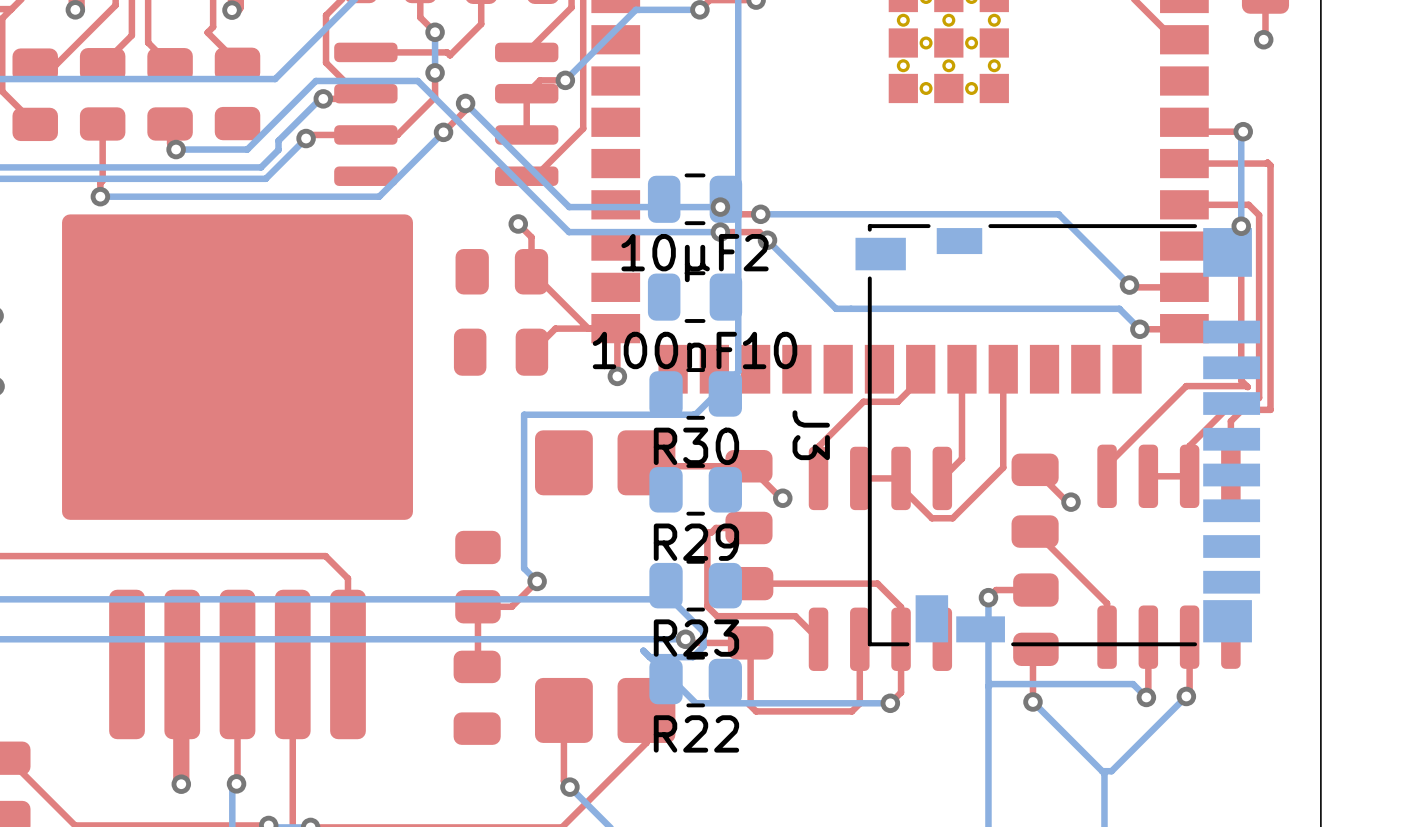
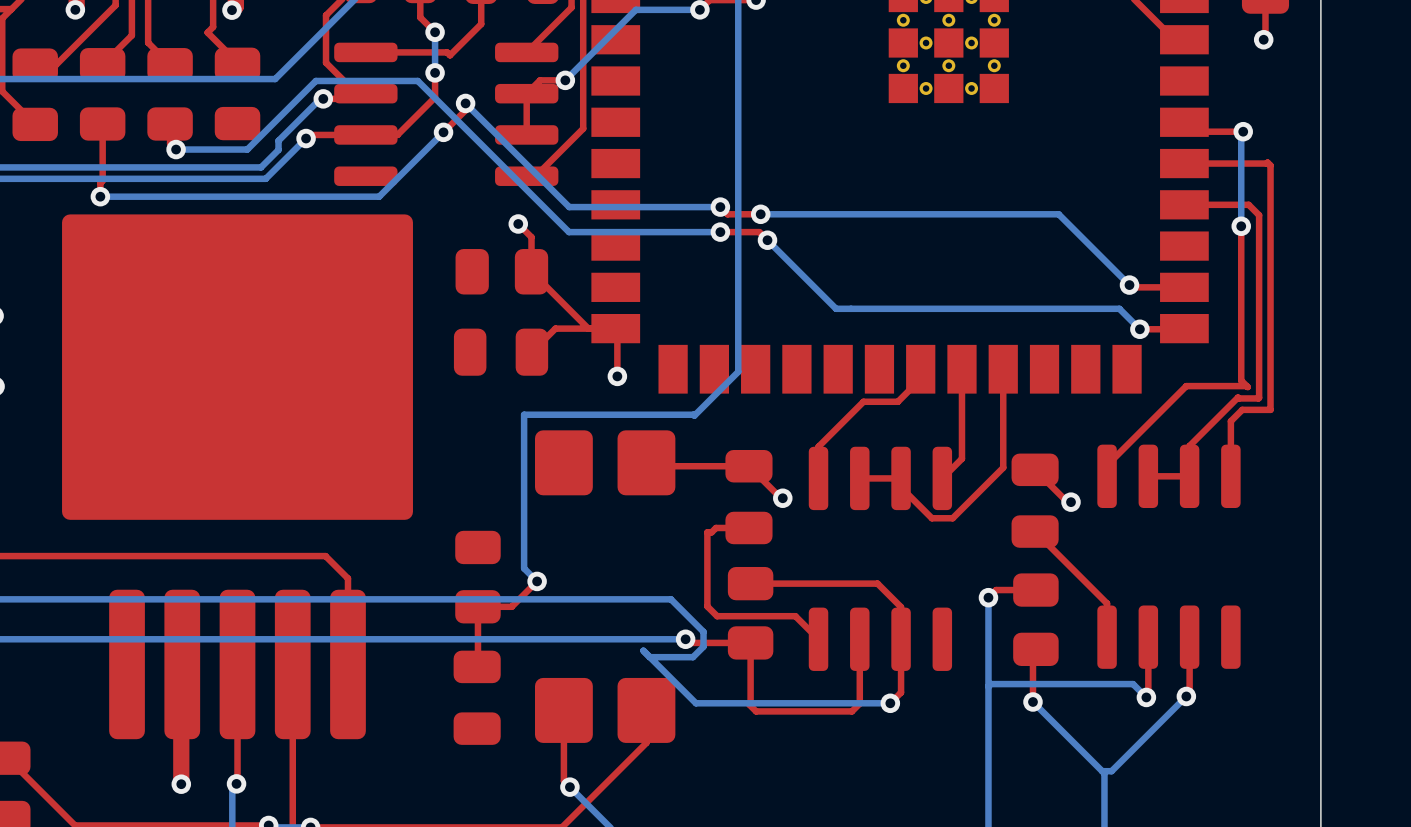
10μF2: (695, 199) -> none
100nF10: (695, 297) -> none
R30: (695, 393) -> none
J3: (1057, 435) -> none
R29: (695, 489) -> none
R23: (695, 585) -> none
R22: (695, 681) -> none

